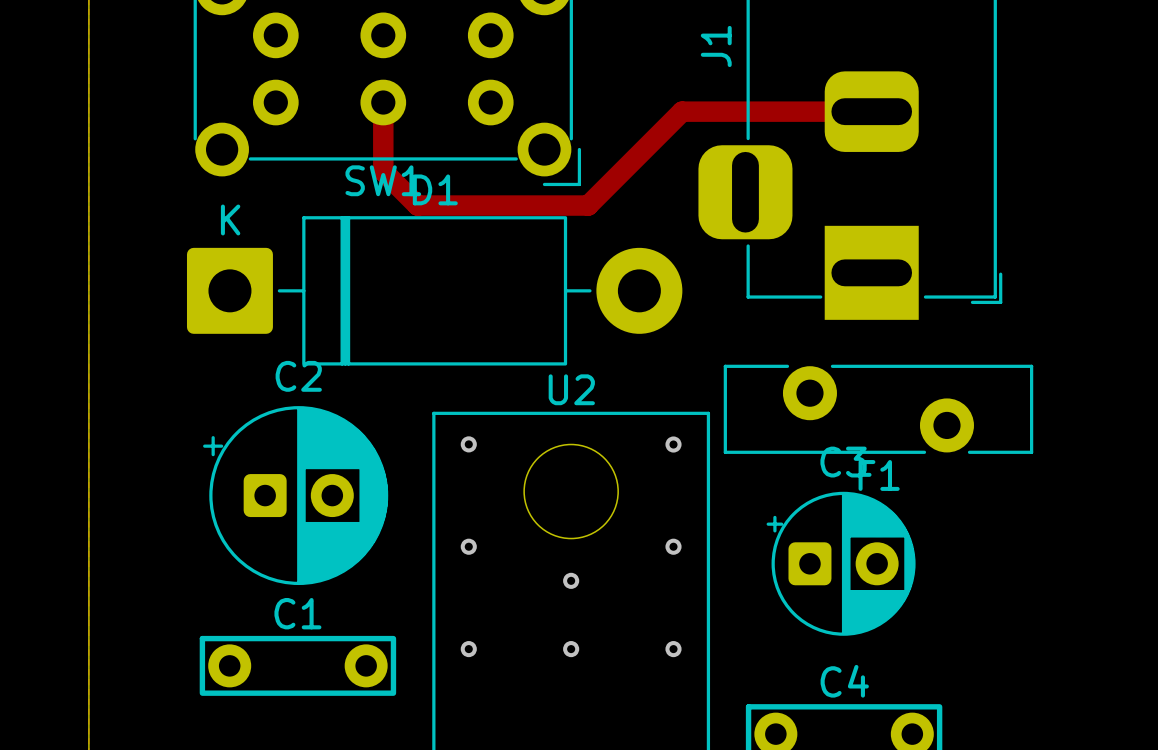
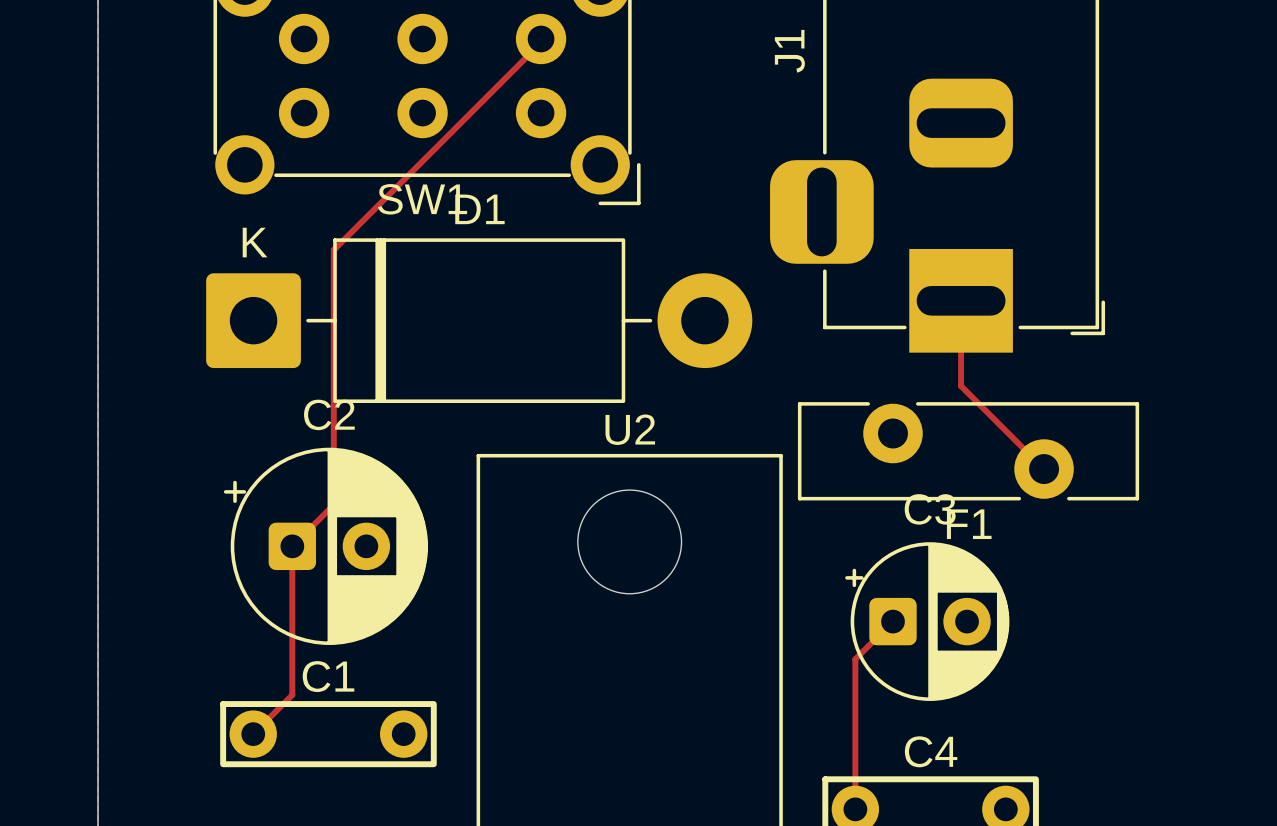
track: none -> (541, 38) (541, 42) (333, 250) (333, 504) (292, 546) (292, 695) (253, 734)
track: (383, 102) (383, 171) (417, 205) (588, 205) (682, 111) (871, 111) -> none
track: none -> (961, 300) (961, 386) (1044, 469)
via: (468, 444) -> none
via: (673, 444) -> none
via: (468, 546) -> none
via: (673, 546) -> none
track: none -> (892, 621) (855, 659) (855, 809)
via: (571, 580) -> none
via: (468, 649) -> none
via: (571, 649) -> none
via: (673, 649) -> none

